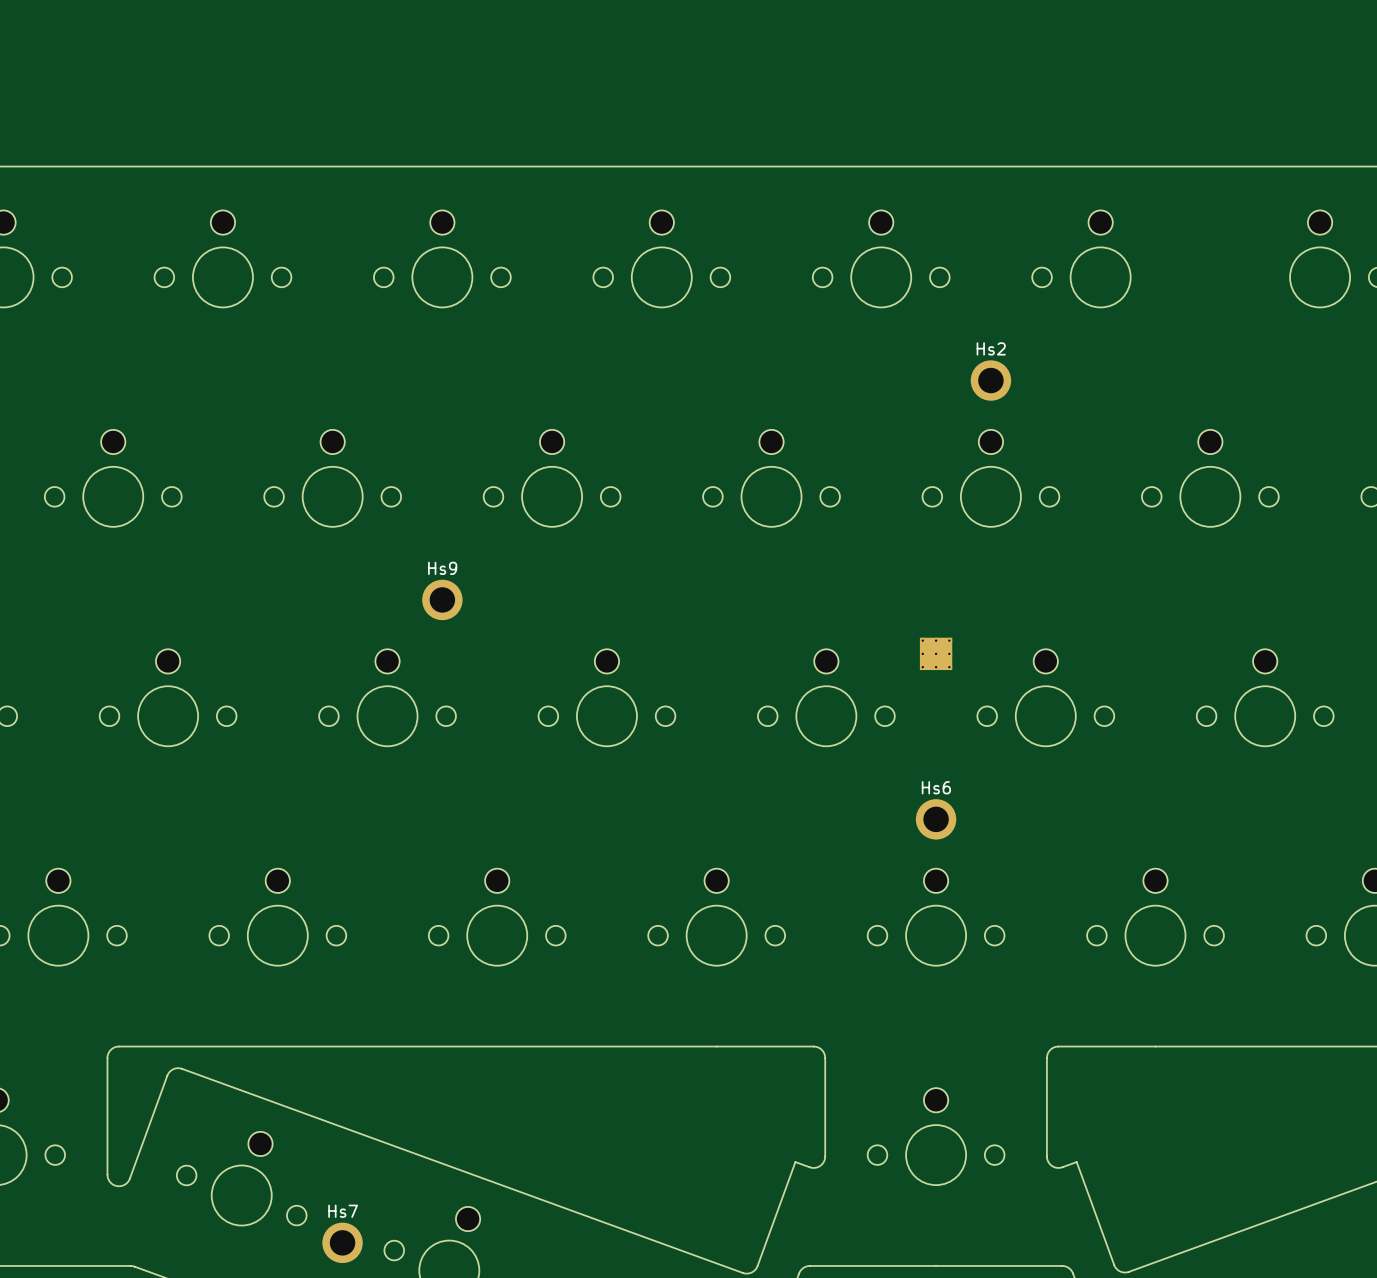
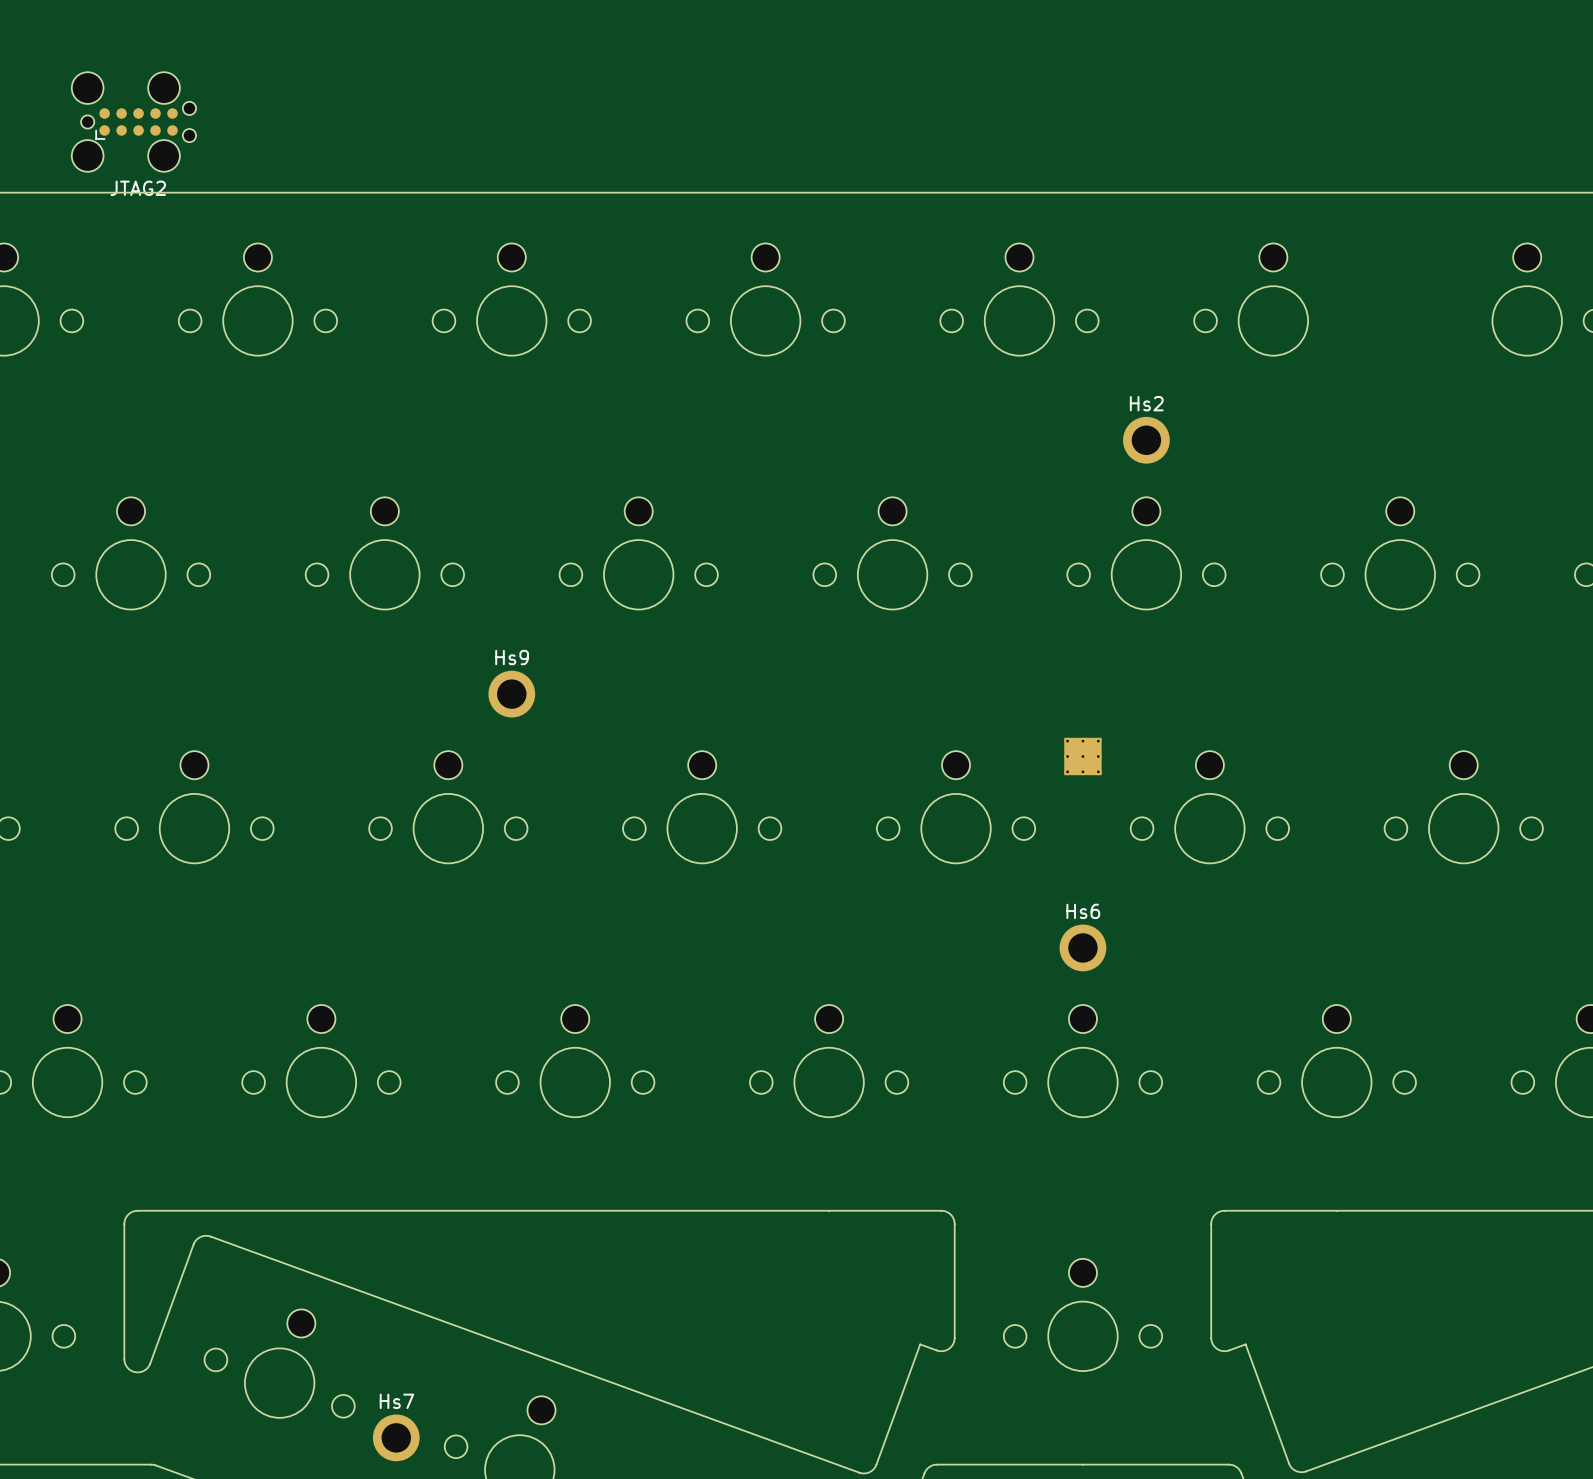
JTAG2: none -> (133, 121)

